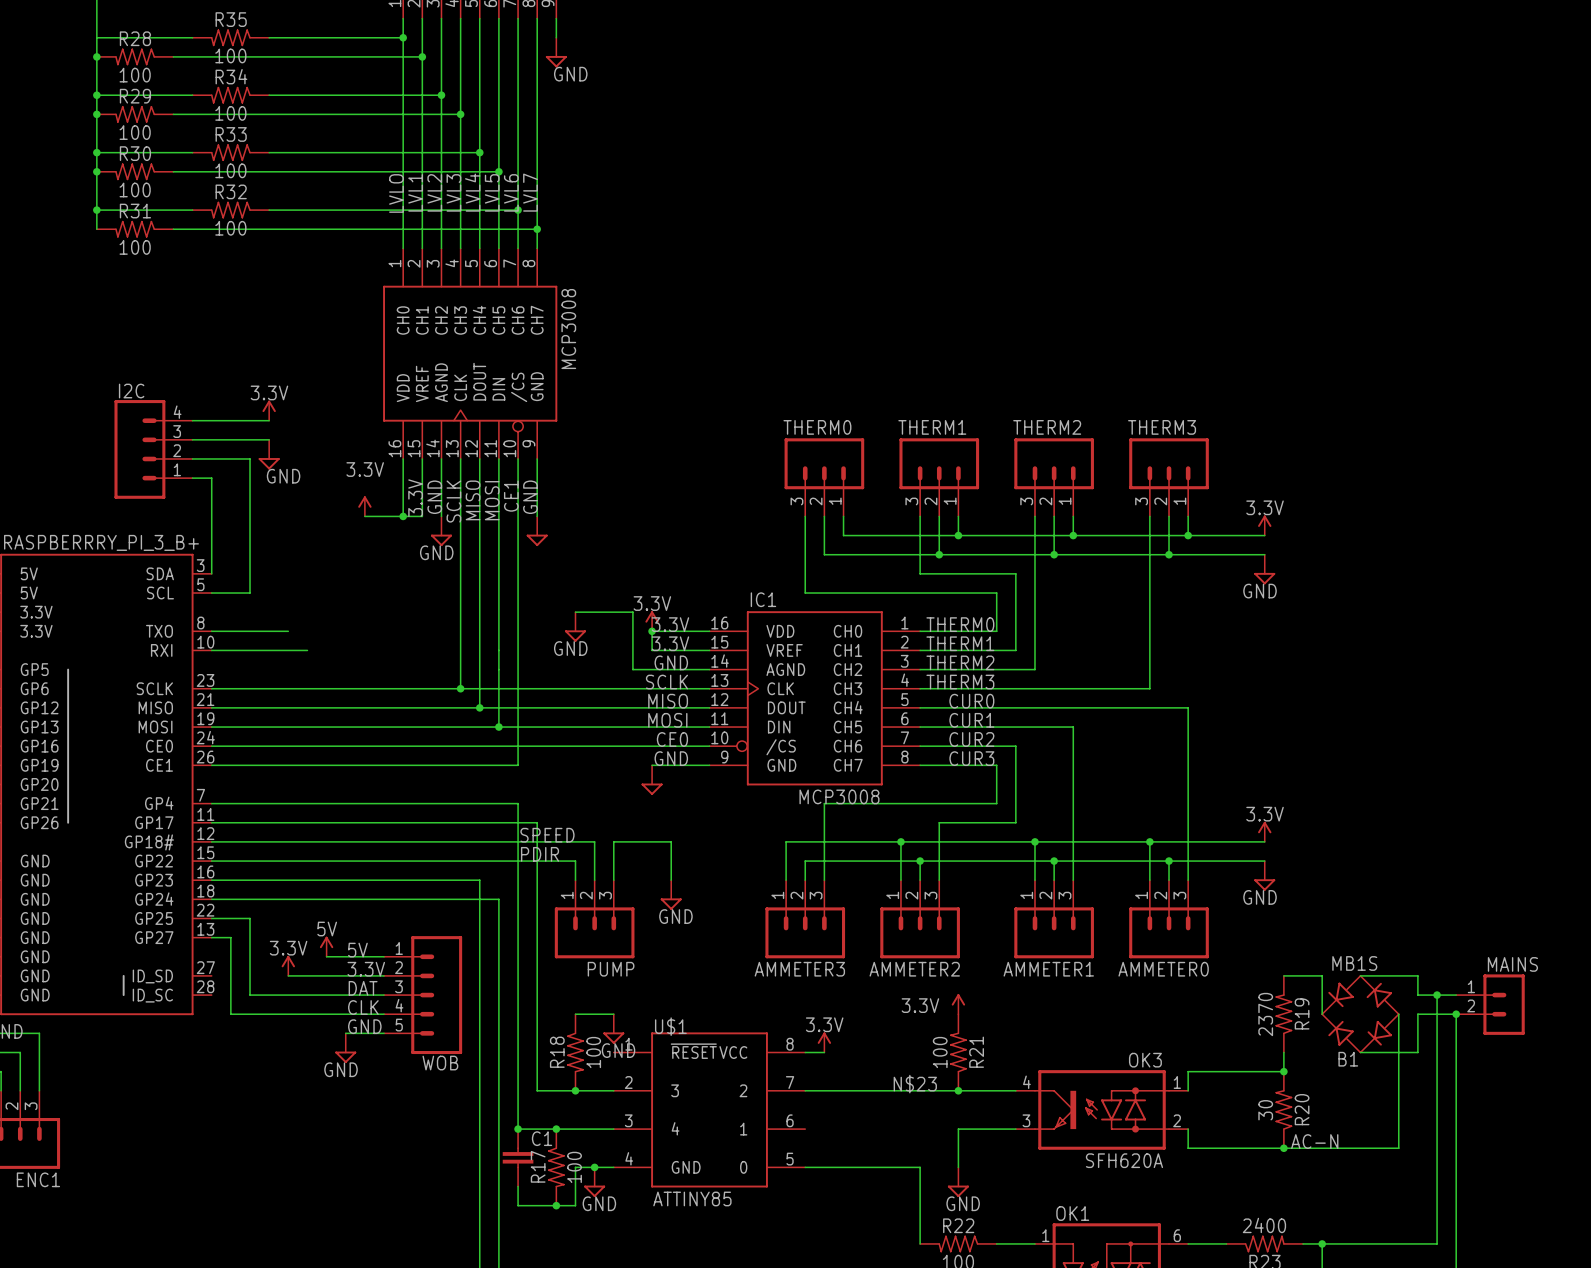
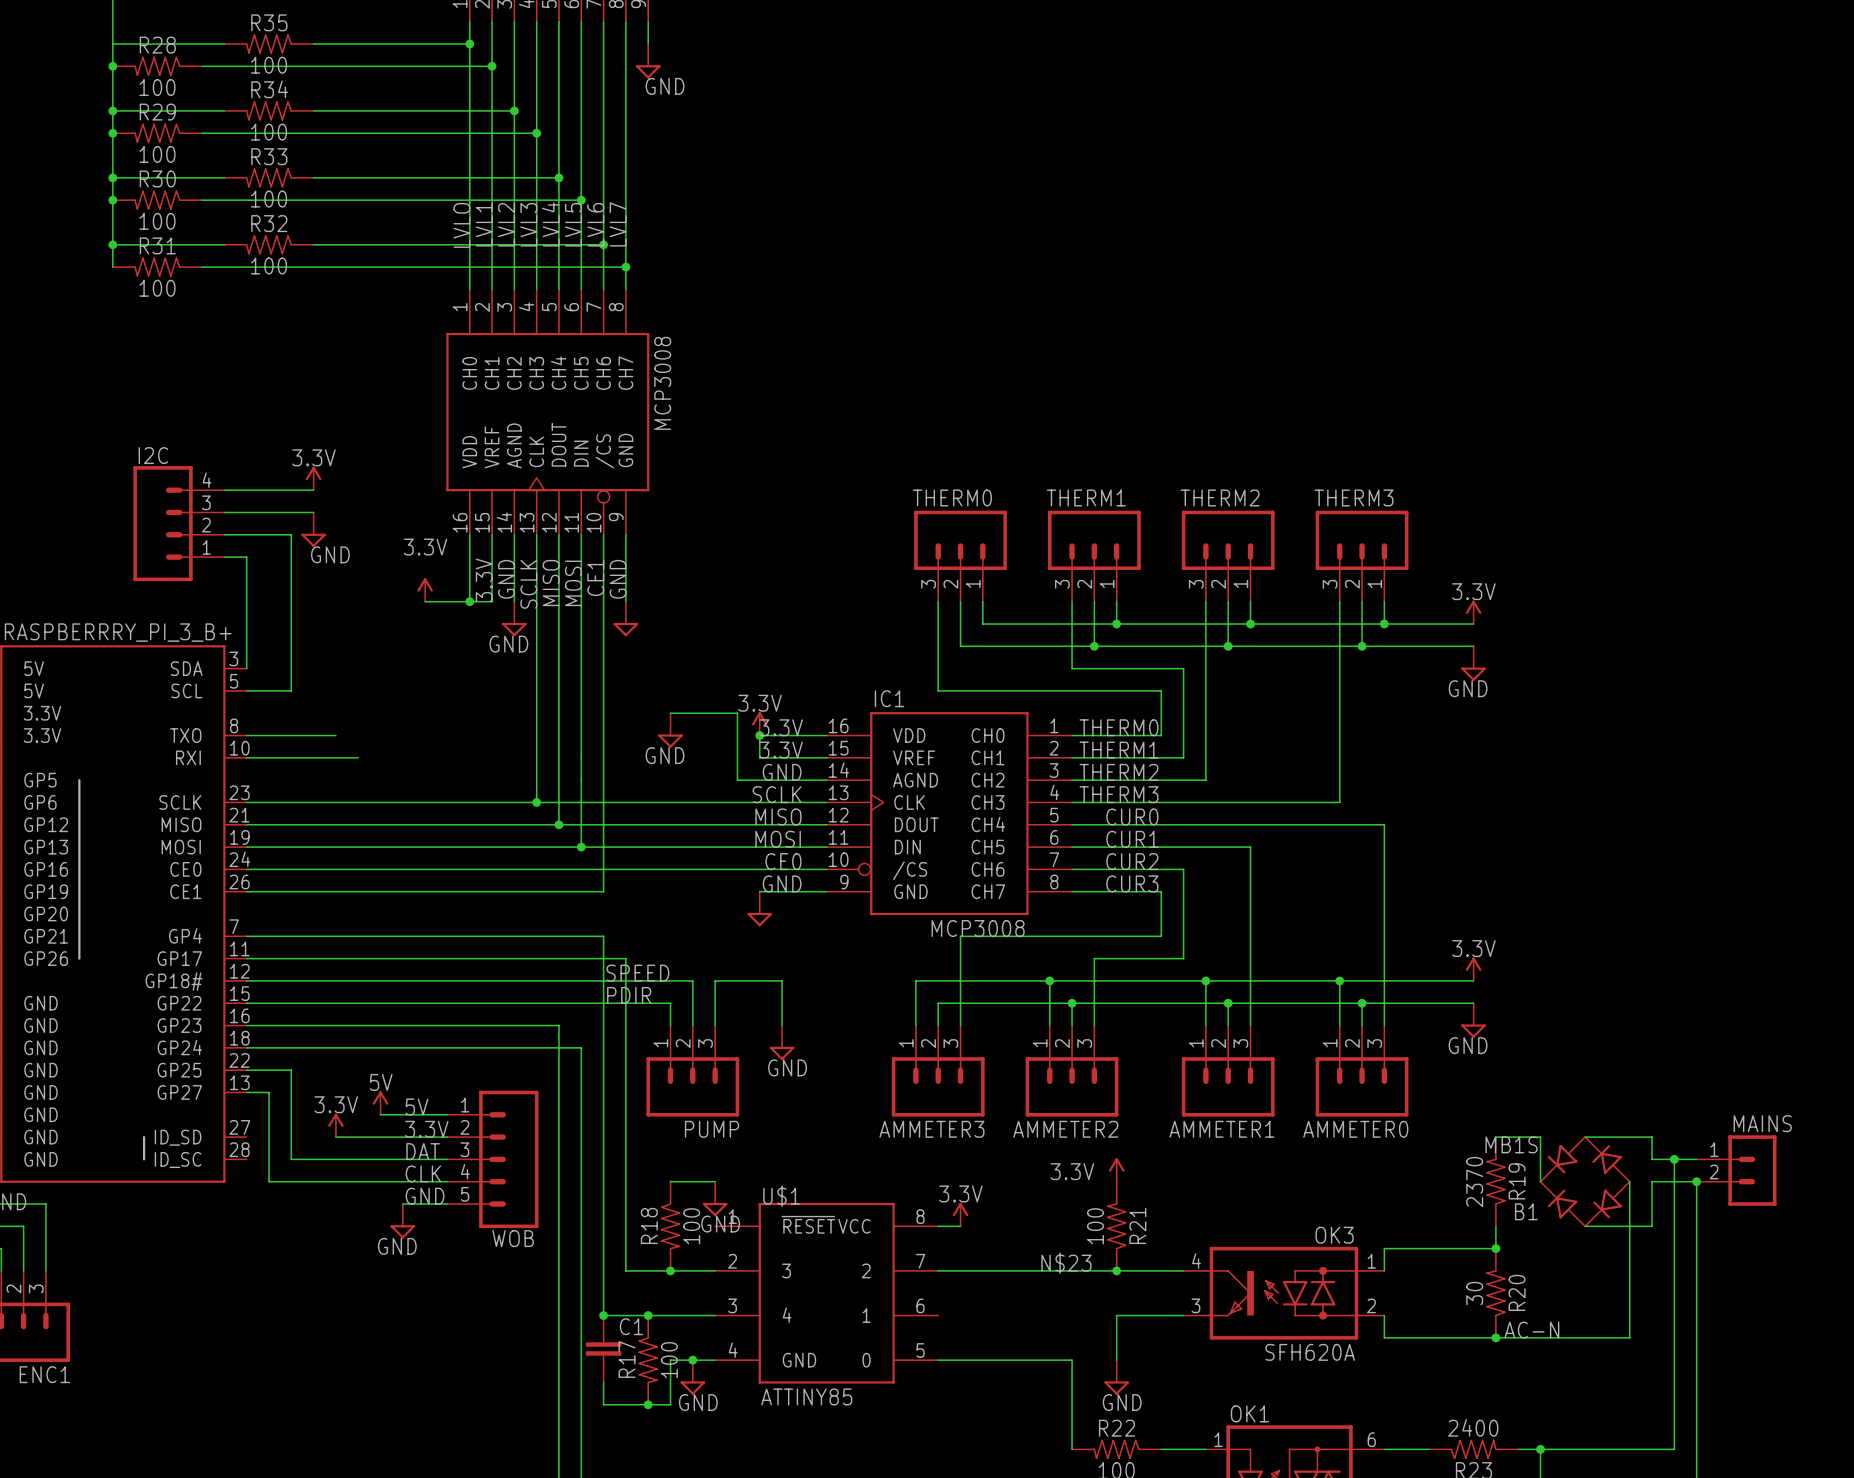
B1 value position: MB1S (1354, 963) -> MB1S (1511, 1144)
B1 name position: B1 (1348, 1059) -> B1 (1526, 1211)

